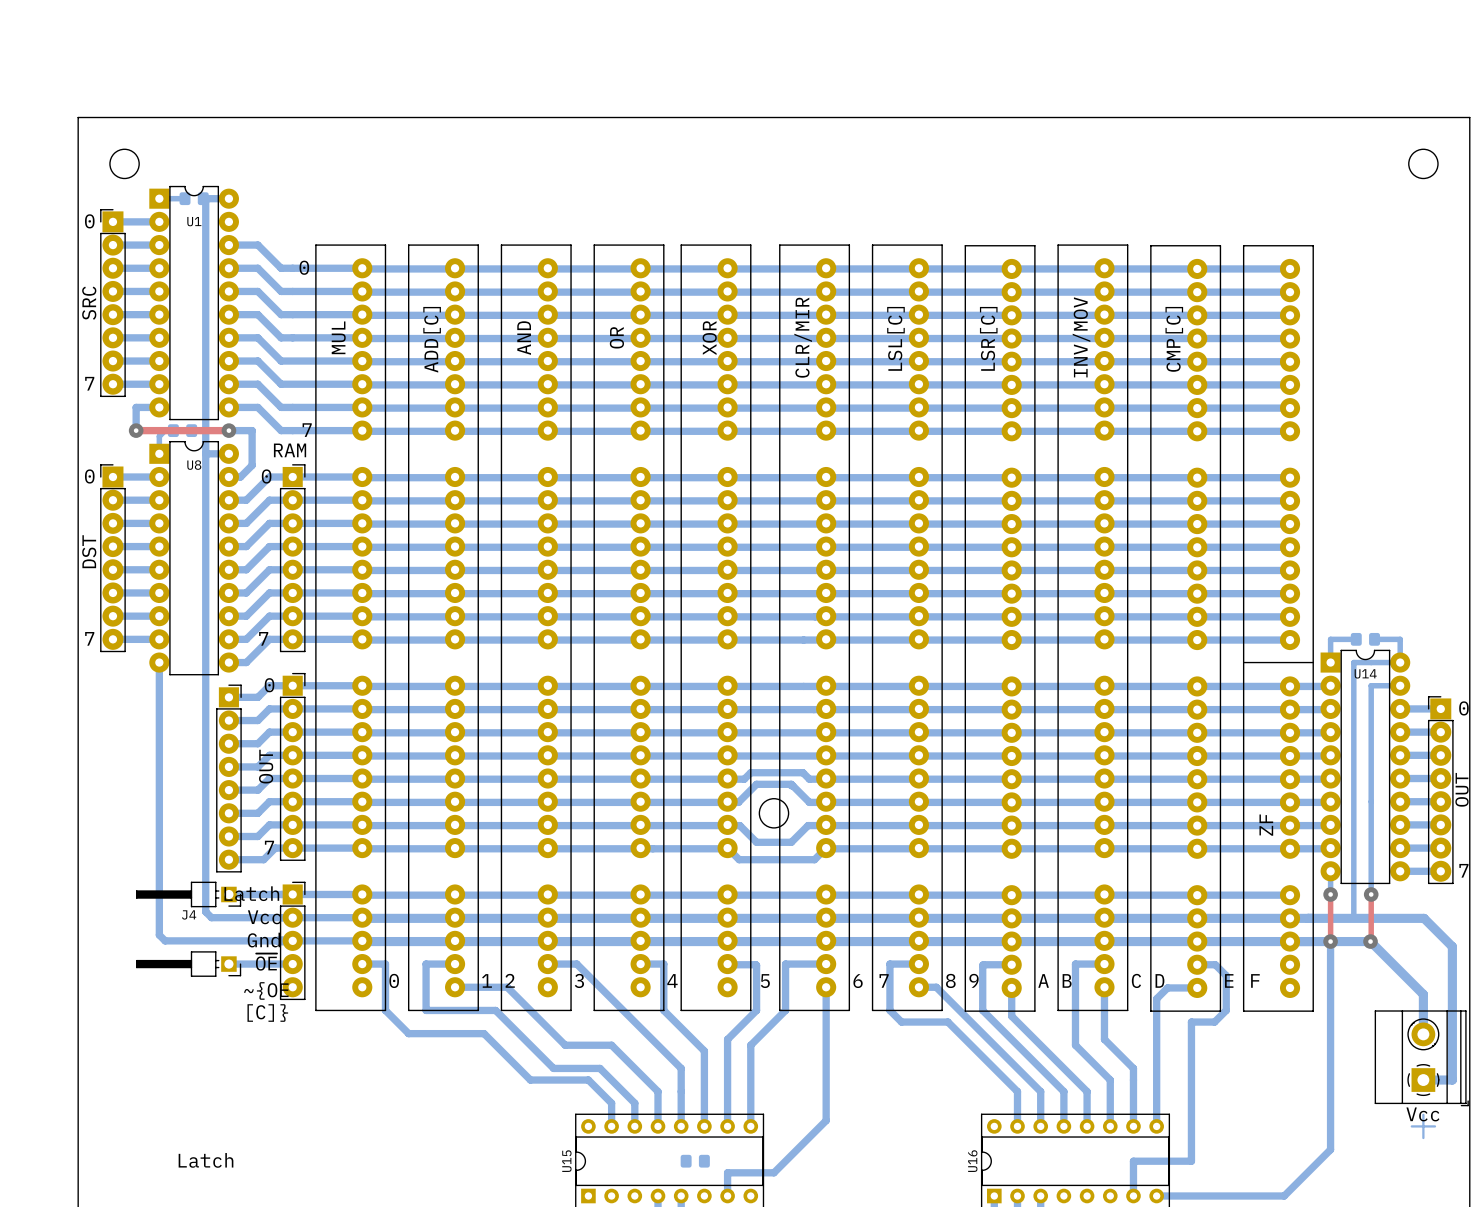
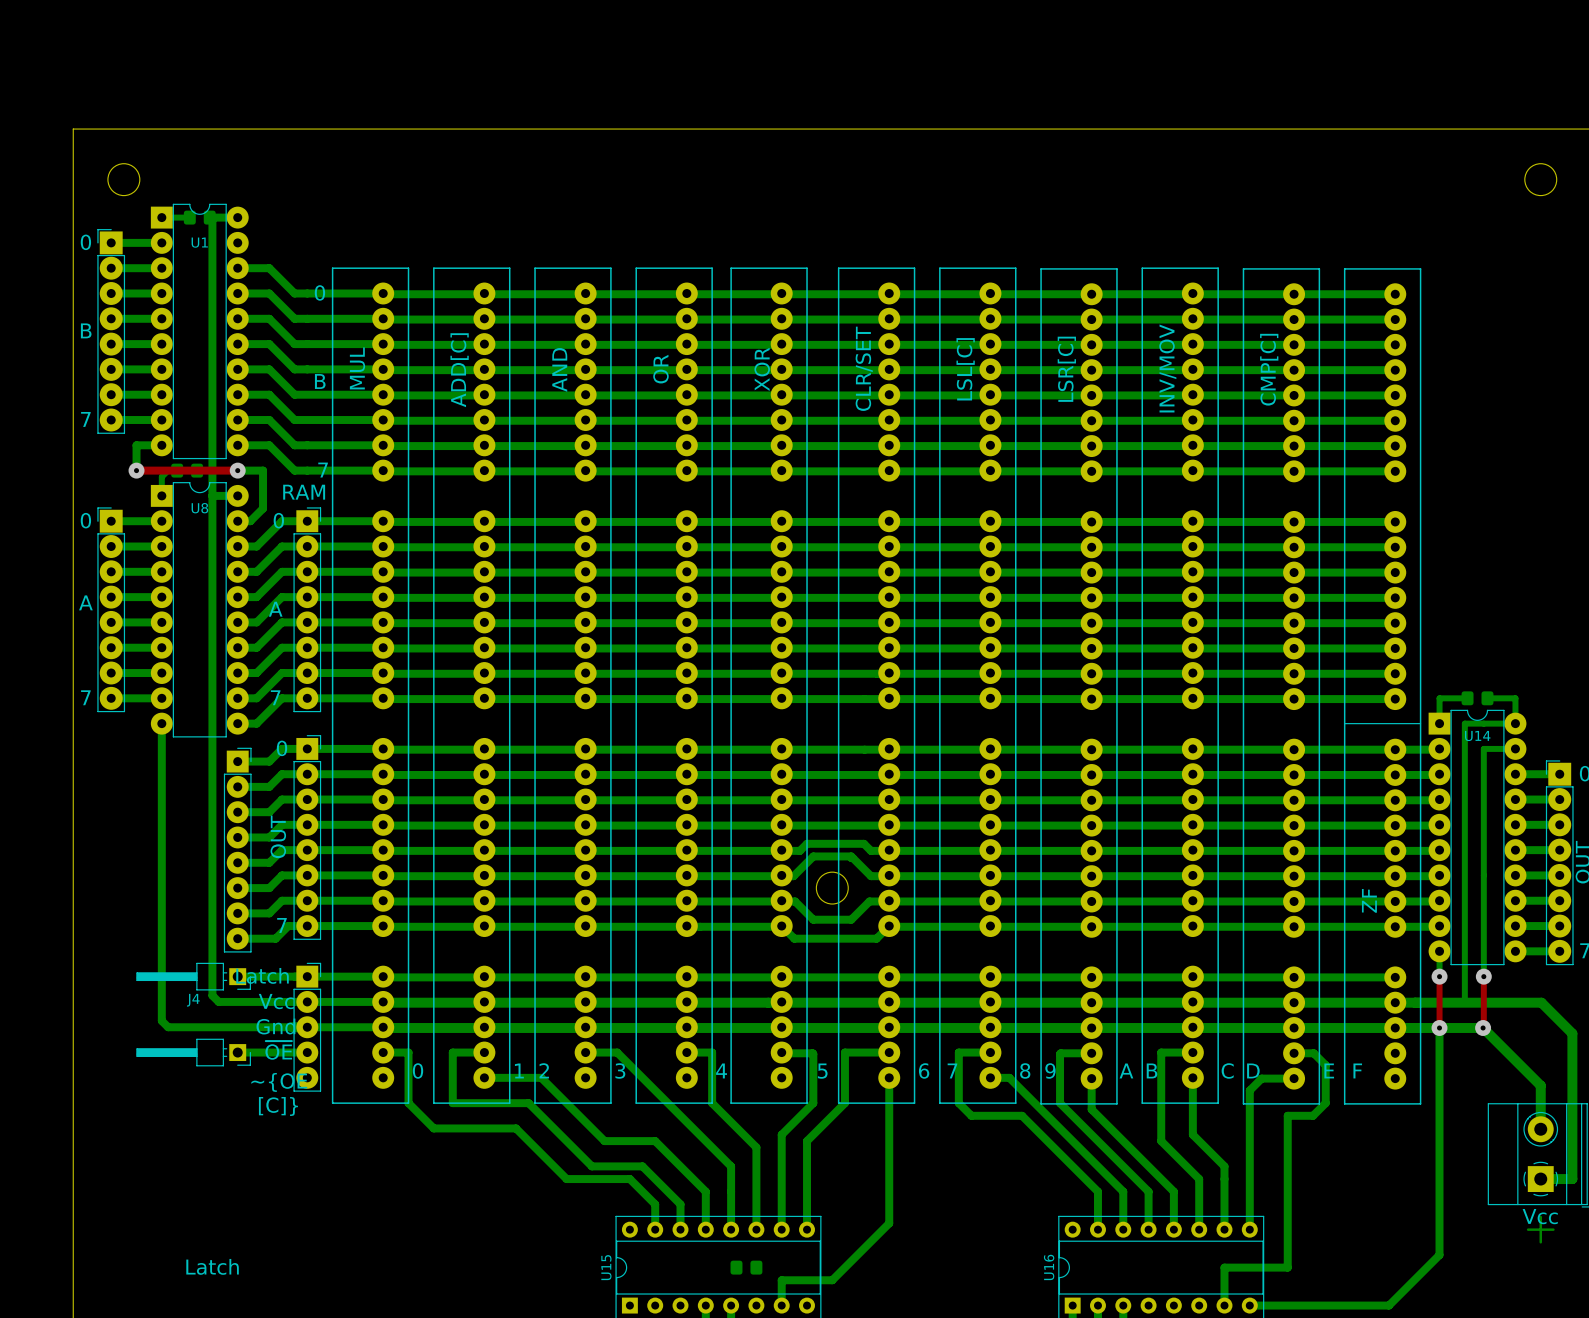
text: SRC (89, 303) -> B (86, 330)
text: CLR/MIR (803, 337) -> CLR/SET (864, 368)
text: none -> B (320, 381)
text: DST (89, 551) -> A (85, 602)
text: none -> A (275, 609)

